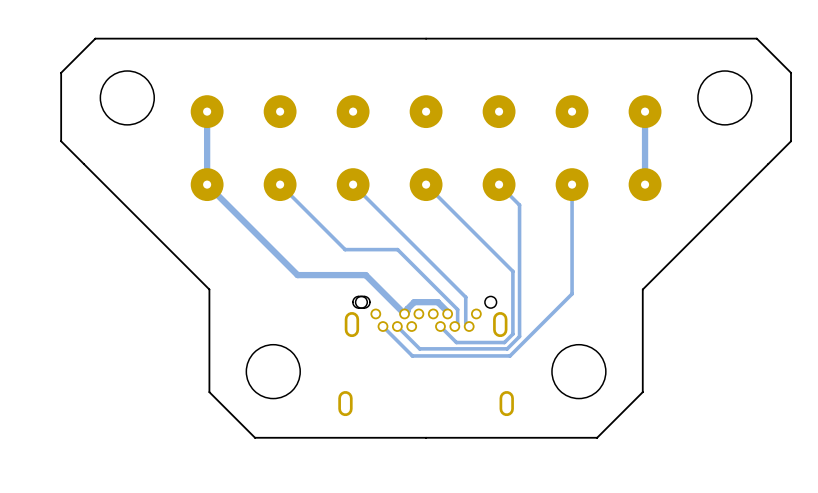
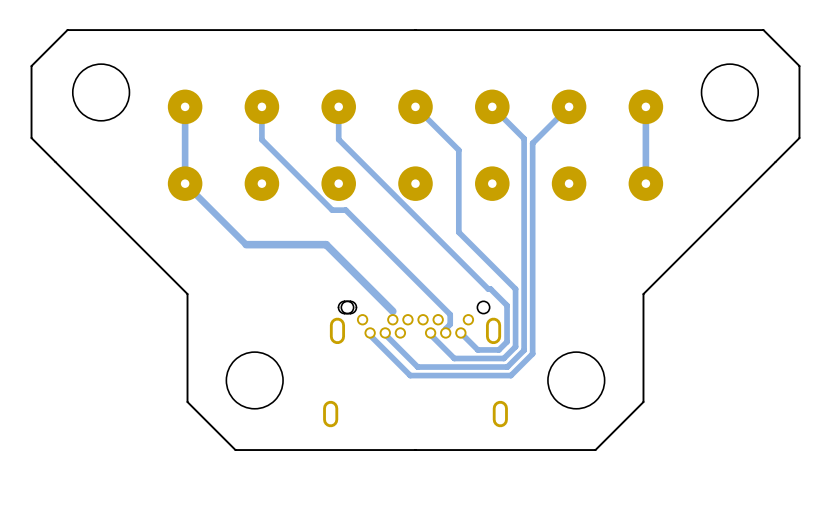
track: (280, 184) (345, 249) (397, 249) (457, 309) (457, 323) (454, 326) -> (261, 106) (261, 139) (332, 210) (345, 210) (450, 314) (450, 324) (445, 328) (445, 332)
track: (353, 184) (465, 297) (465, 323) (469, 326) -> (338, 106) (338, 139) (507, 305) (507, 341) (498, 349) (477, 349) (460, 332)
track: (426, 184) (512, 271) (512, 334) (504, 342) (456, 342) (440, 326) -> (415, 106) (458, 150) (458, 232) (515, 289) (515, 346) (503, 358) (454, 358) (430, 332)
track: (499, 184) (519, 205) (519, 336) (507, 348) (419, 348) (397, 326) -> (492, 106) (524, 138) (524, 350) (507, 367) (417, 367) (385, 332)
track: (572, 184) (572, 293) (510, 355) (412, 355) (382, 326) -> (569, 106) (532, 143) (532, 353) (510, 375) (410, 375) (370, 335) (370, 332)
track: (265, 242) (297, 275) (365, 275) (404, 313) (414, 302) (437, 302) (447, 311) -> (246, 244) (326, 244) (392, 311)

